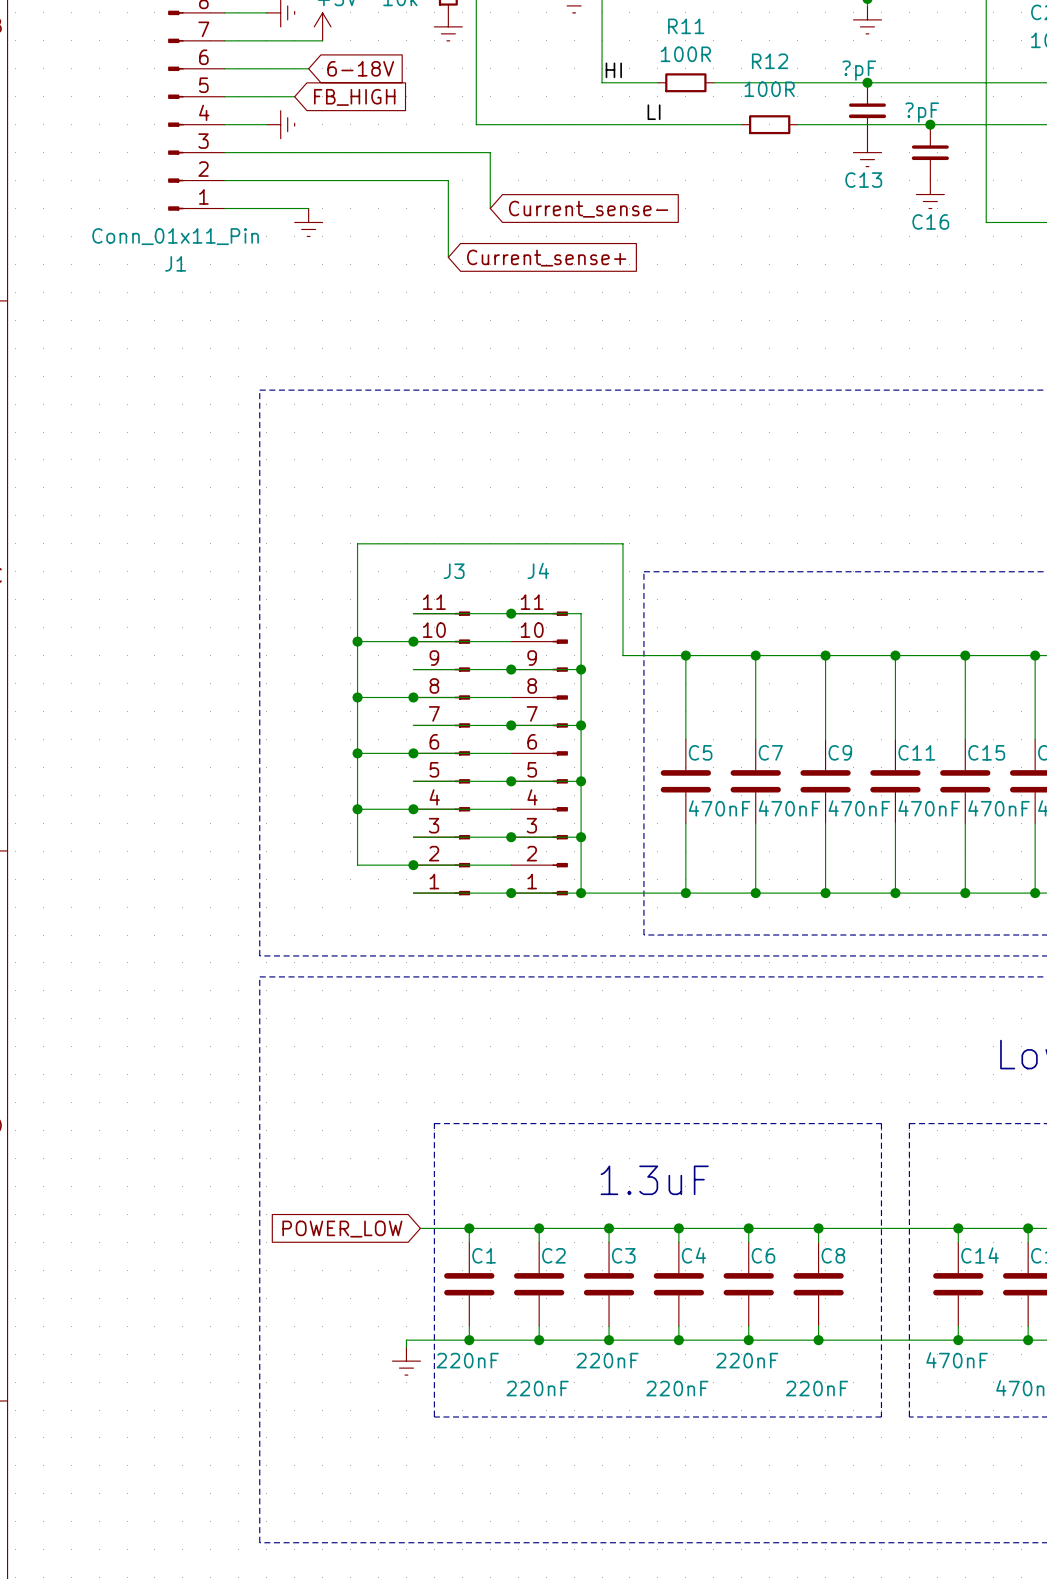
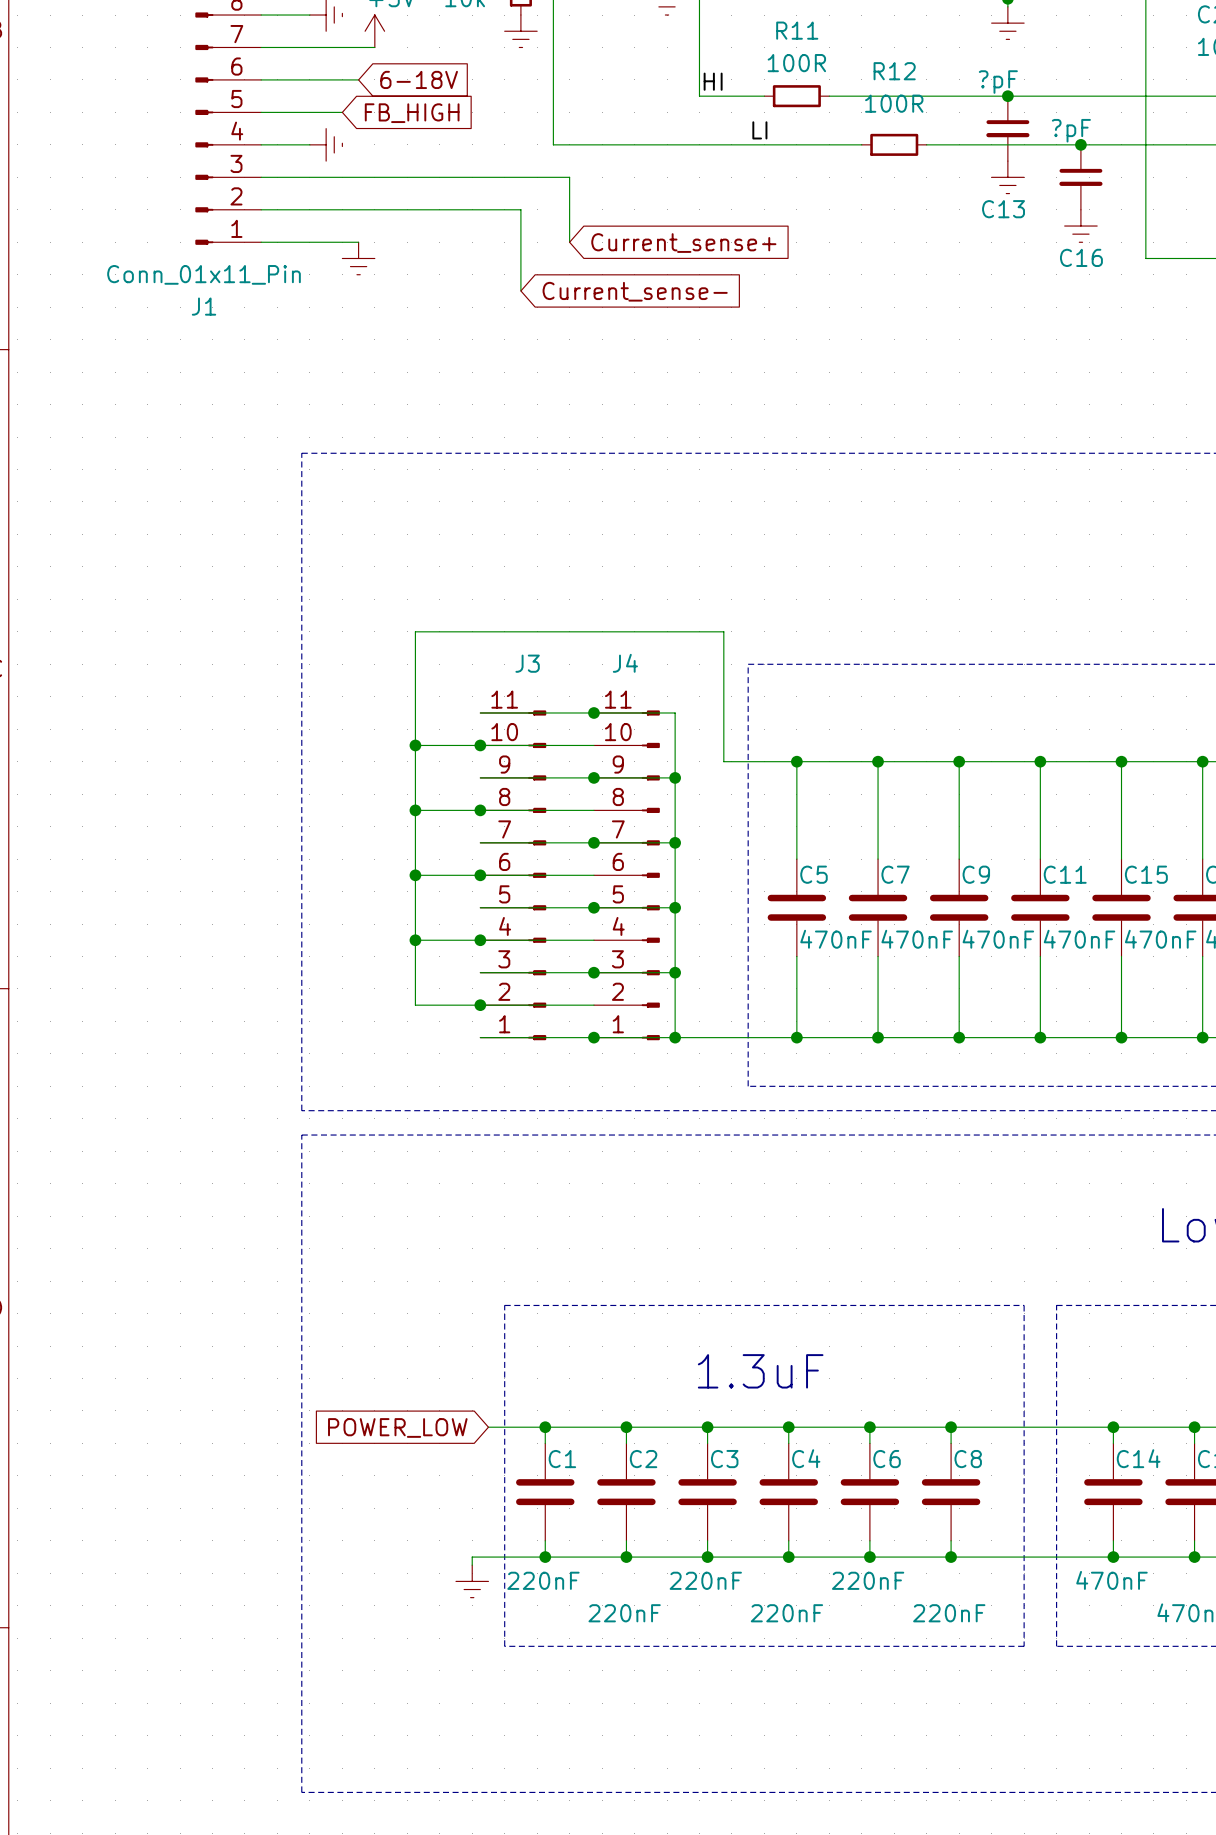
global label: Current_sense- (588, 209) -> Current_sense+ (683, 243)
wire: (448, 250) (448, 257) -> none
global label: Current_sense+ (546, 258) -> Current_sense- (635, 291)

